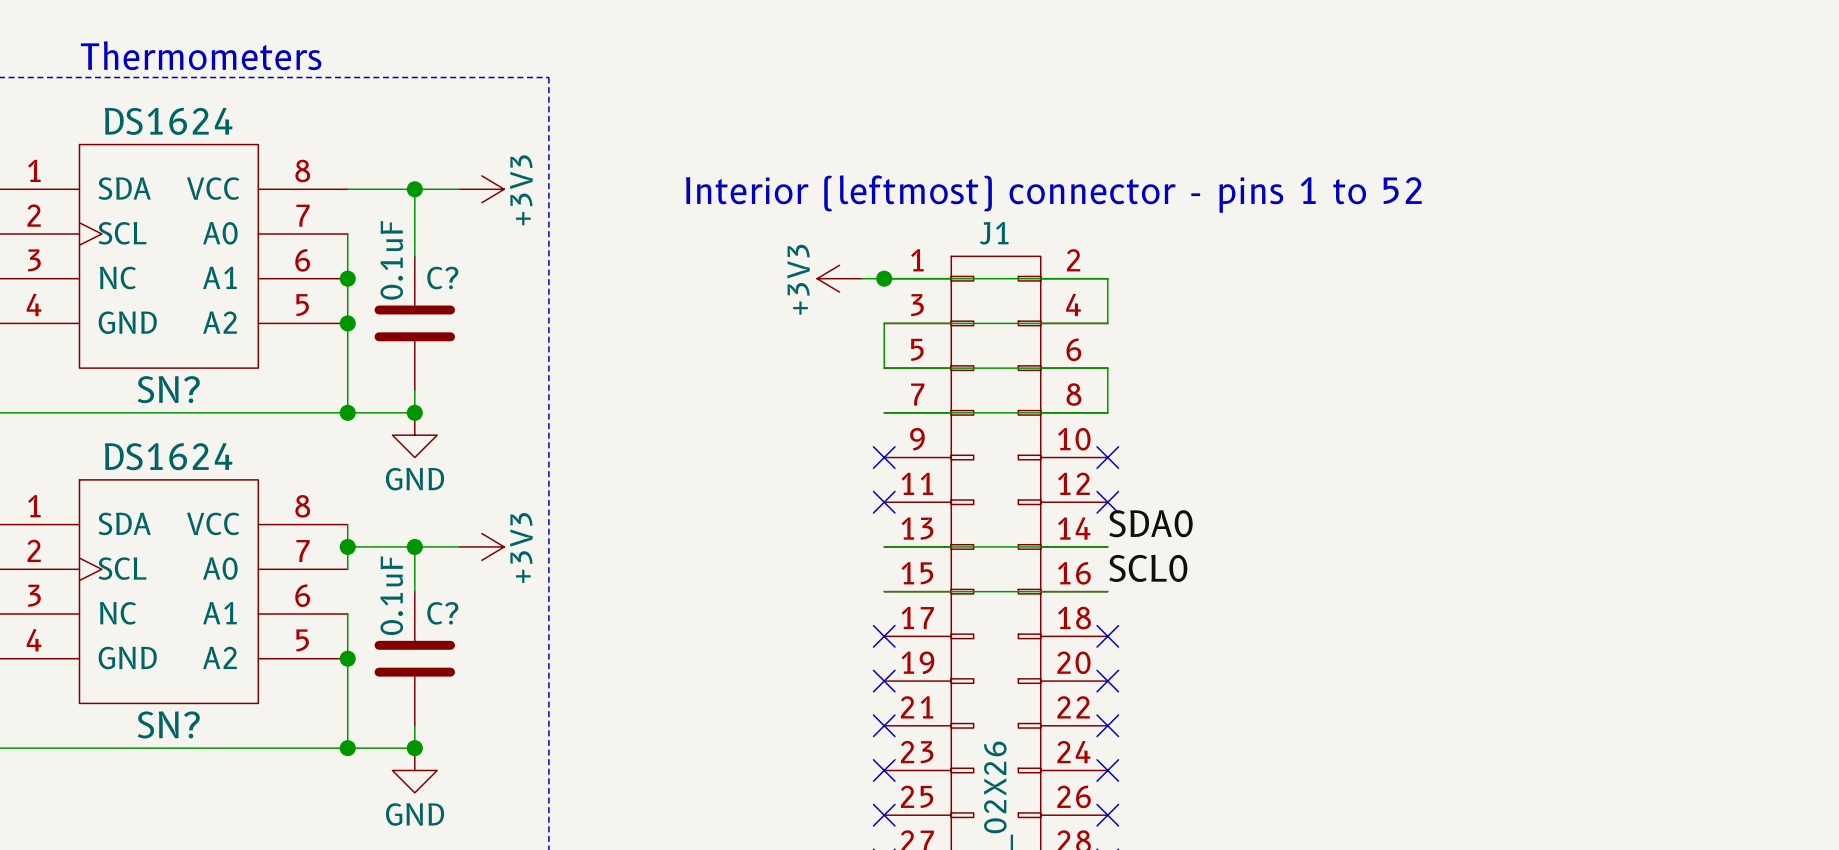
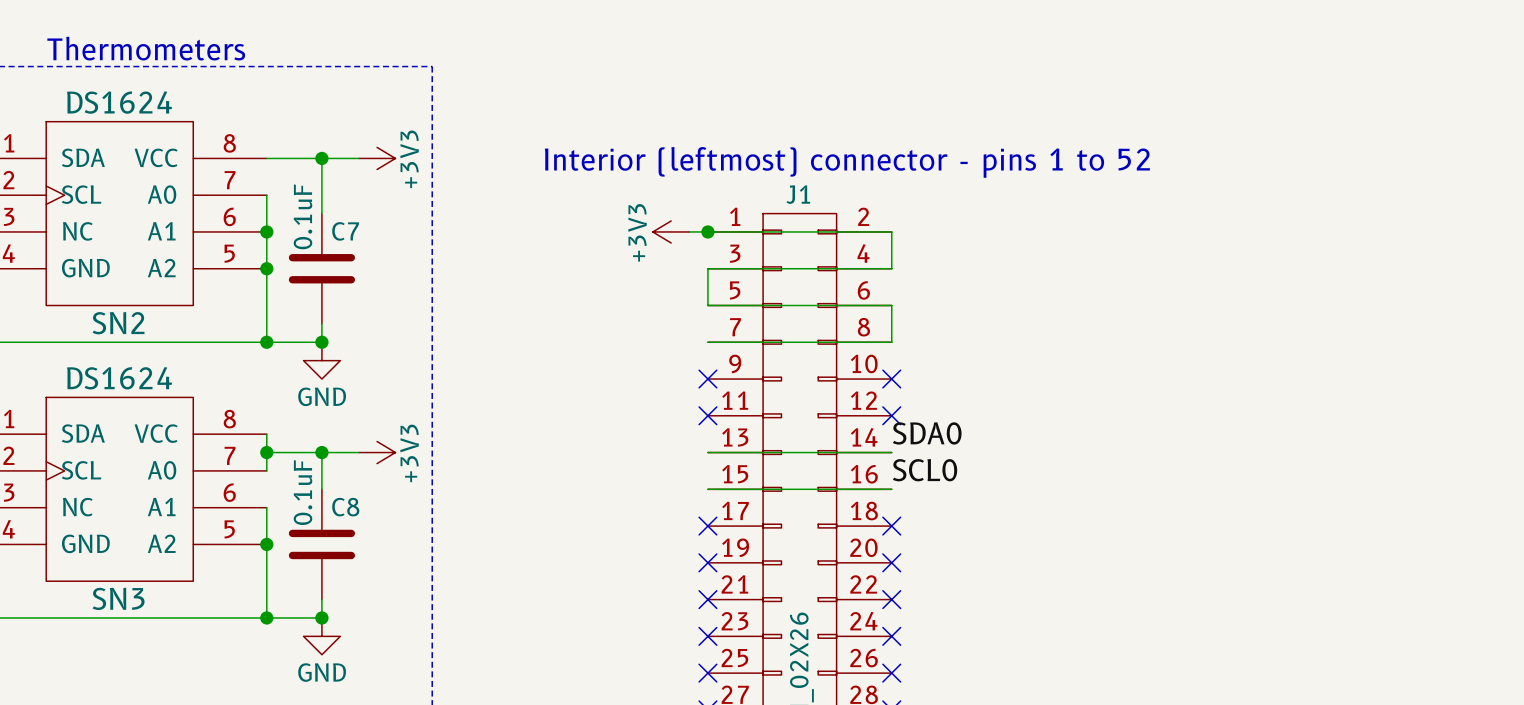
C? name: C? (442, 278) -> C7 (345, 231)
SN? name: SN? (168, 389) -> SN2 (118, 323)
C? name: C? (442, 613) -> C8 (345, 507)
SN? name: SN? (168, 724) -> SN3 (118, 598)

